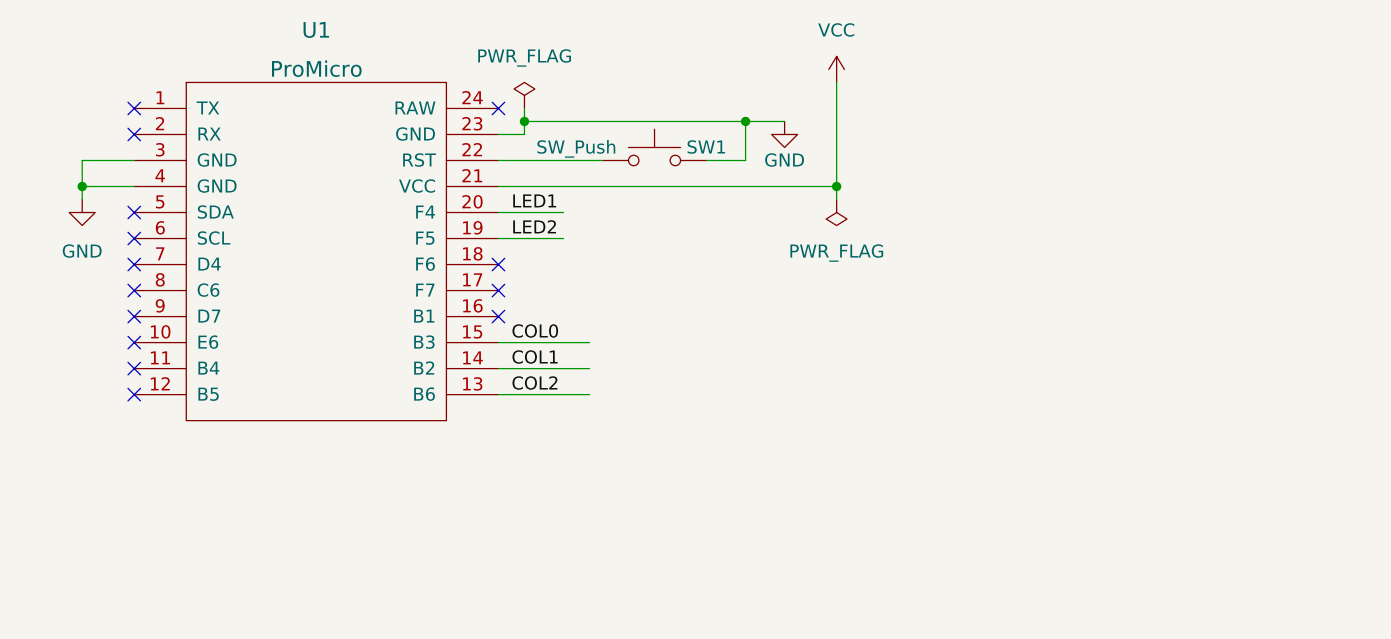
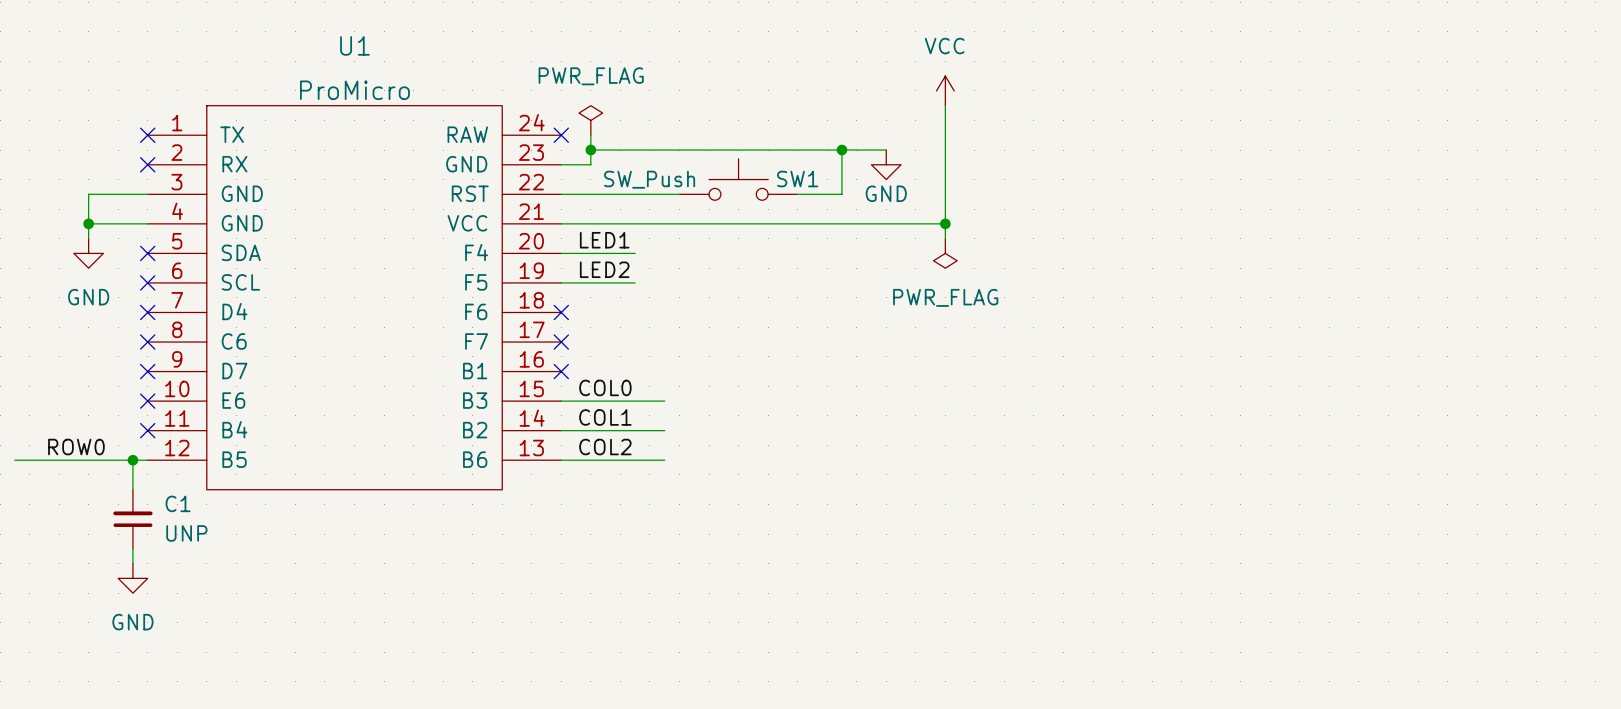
label: none -> ROW0 (76, 447)
wire: none -> (14, 460) (147, 460)
wire: none -> (132, 460) (132, 489)
junction: none -> (132, 460)
no-connect mark: (134, 394) -> none
C1: none -> UNP (132, 519)
wire: none -> (132, 548) (132, 563)
power symbol: none -> GND (132, 578)

